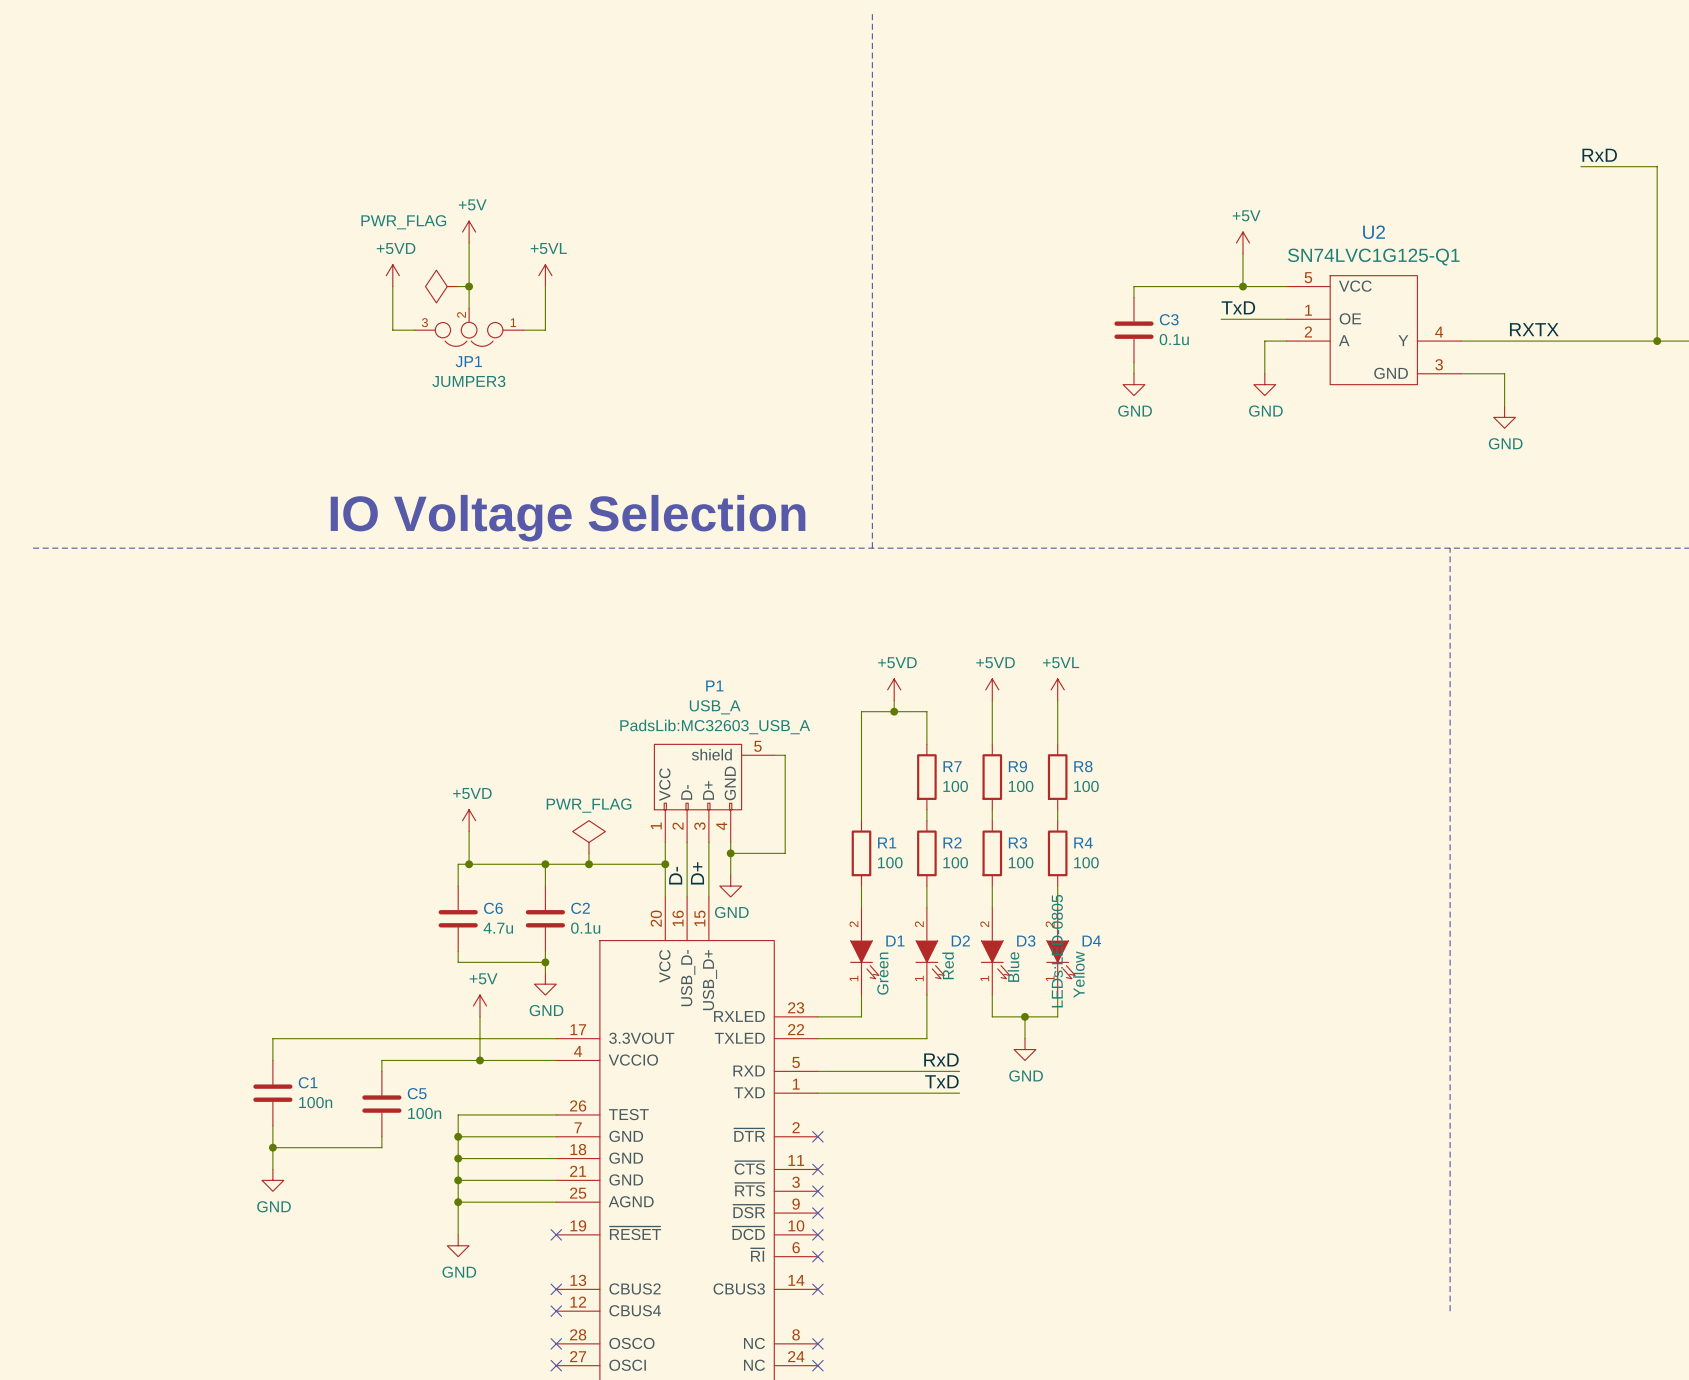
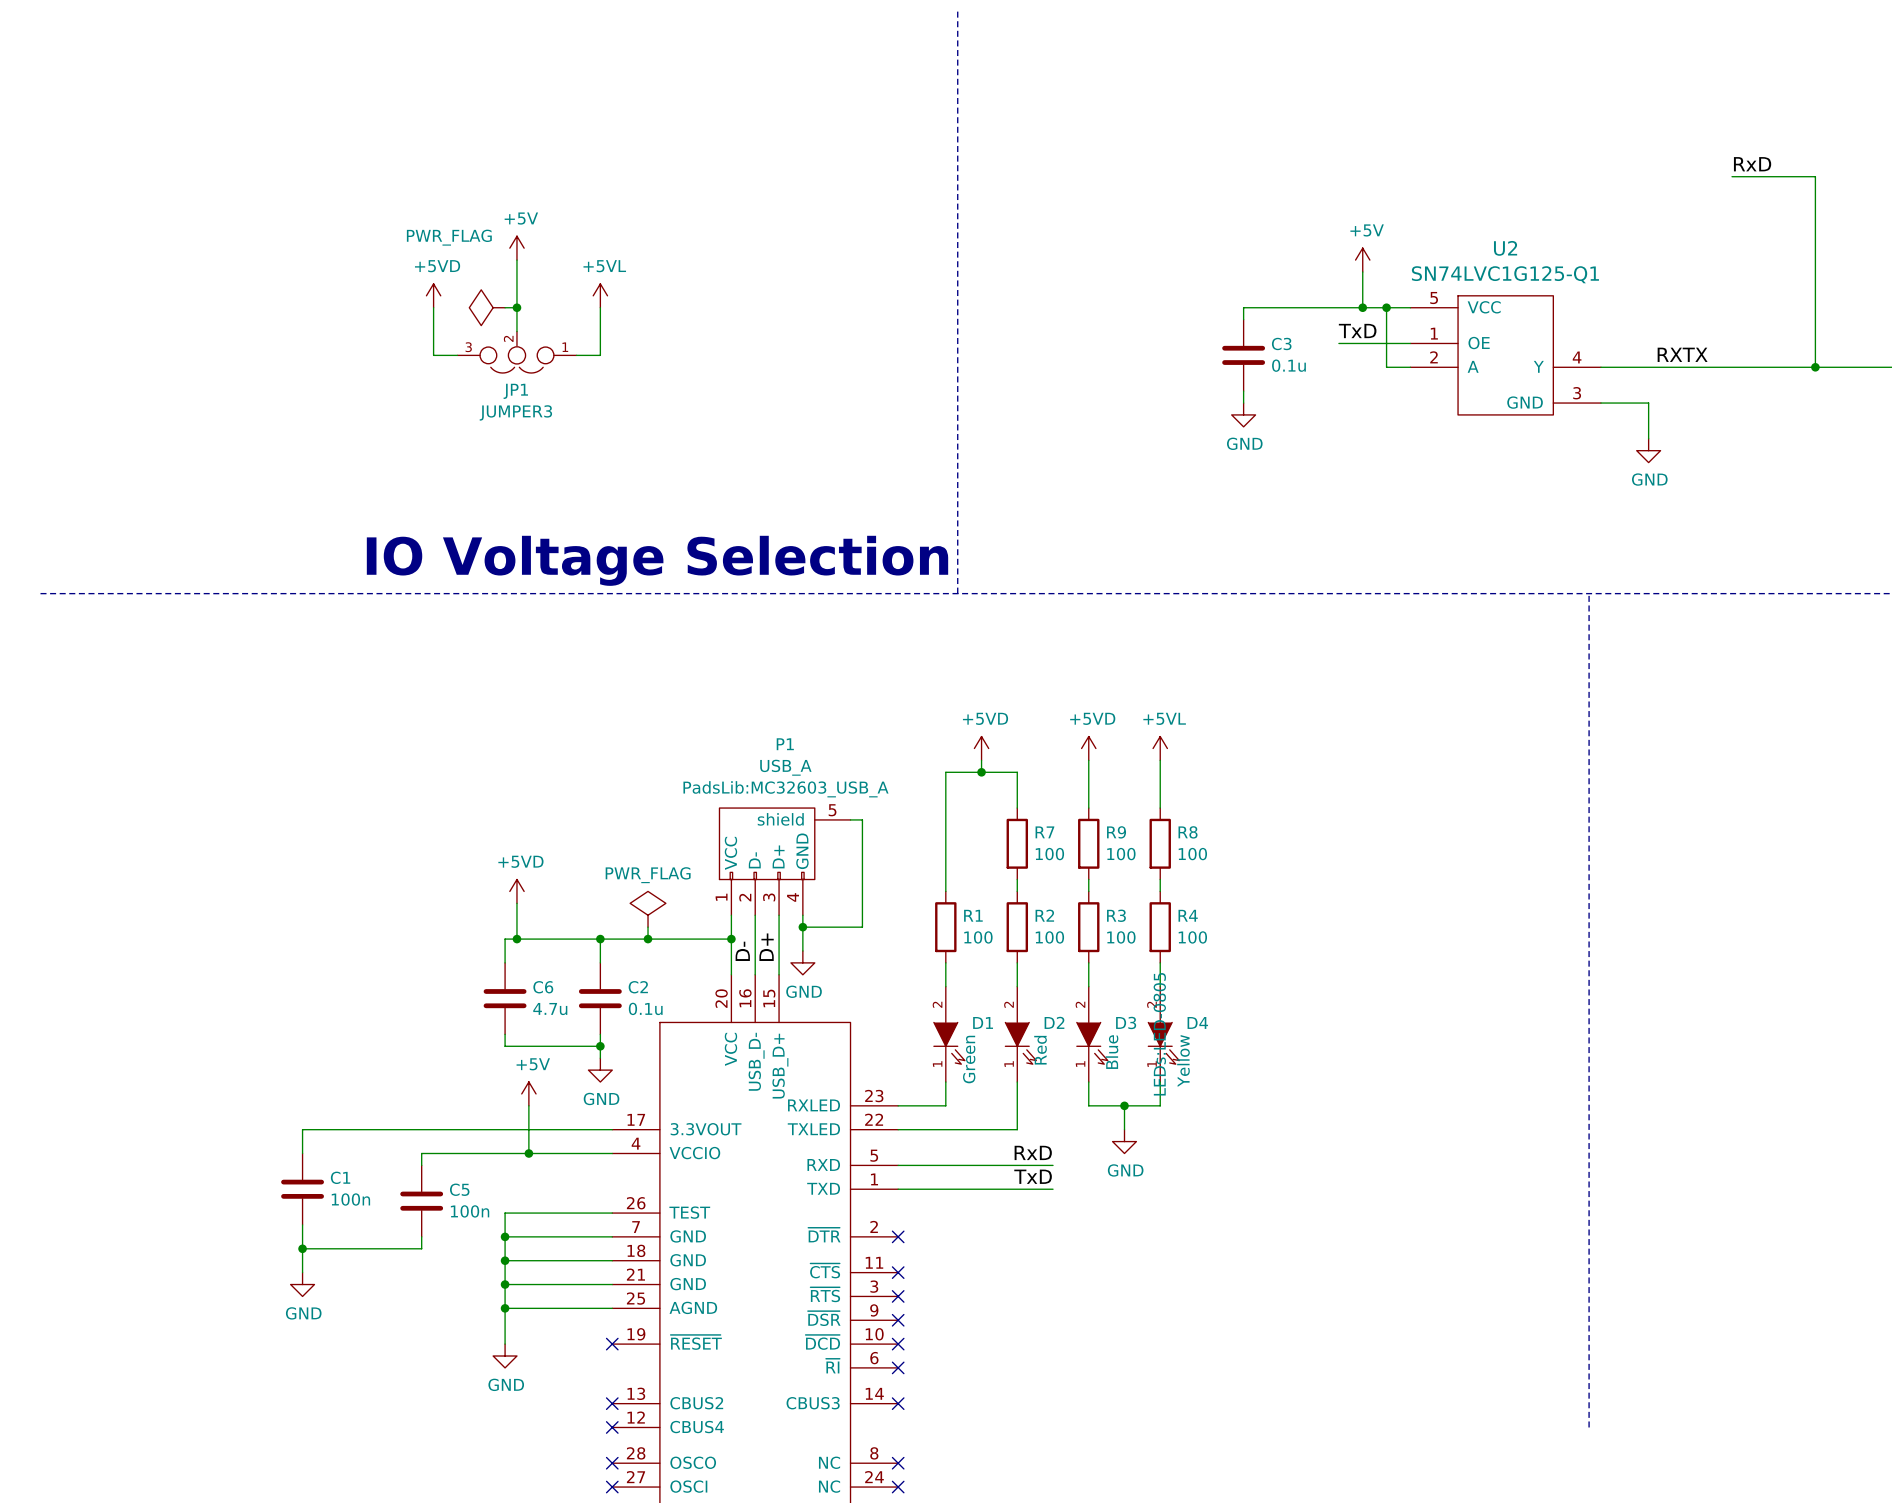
junction: none -> (1386, 307)
wire: (1264, 341) (1264, 373) -> (1386, 367) (1386, 307)
power symbol: GND (1264, 384) -> none

